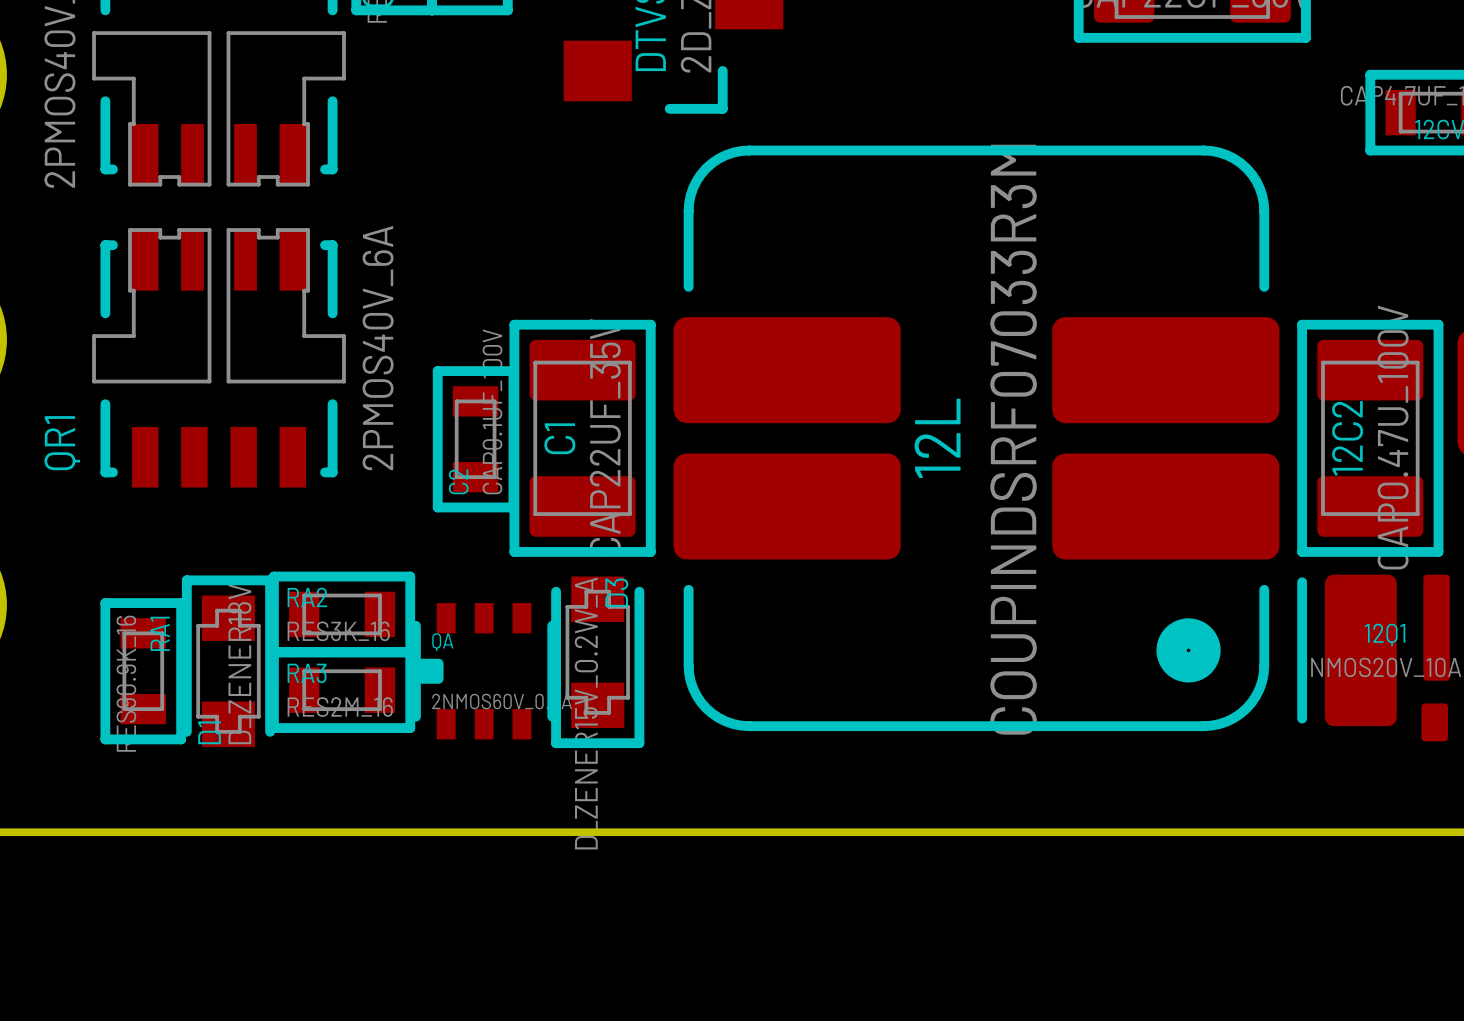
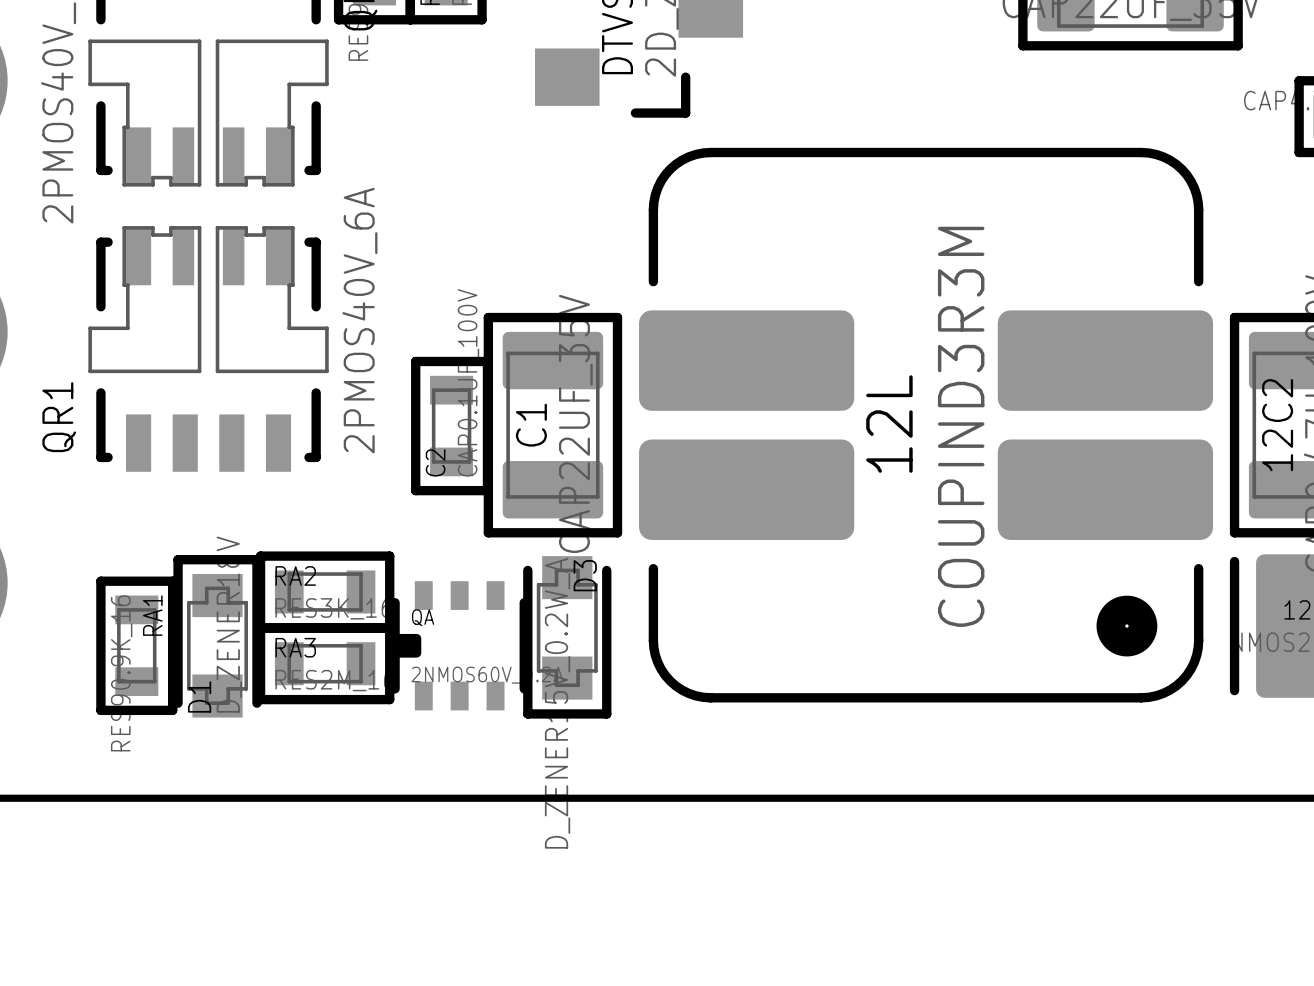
12L value: COUPINDSRF07033R3M (1013, 439) -> COUPIND3R3M (961, 426)

